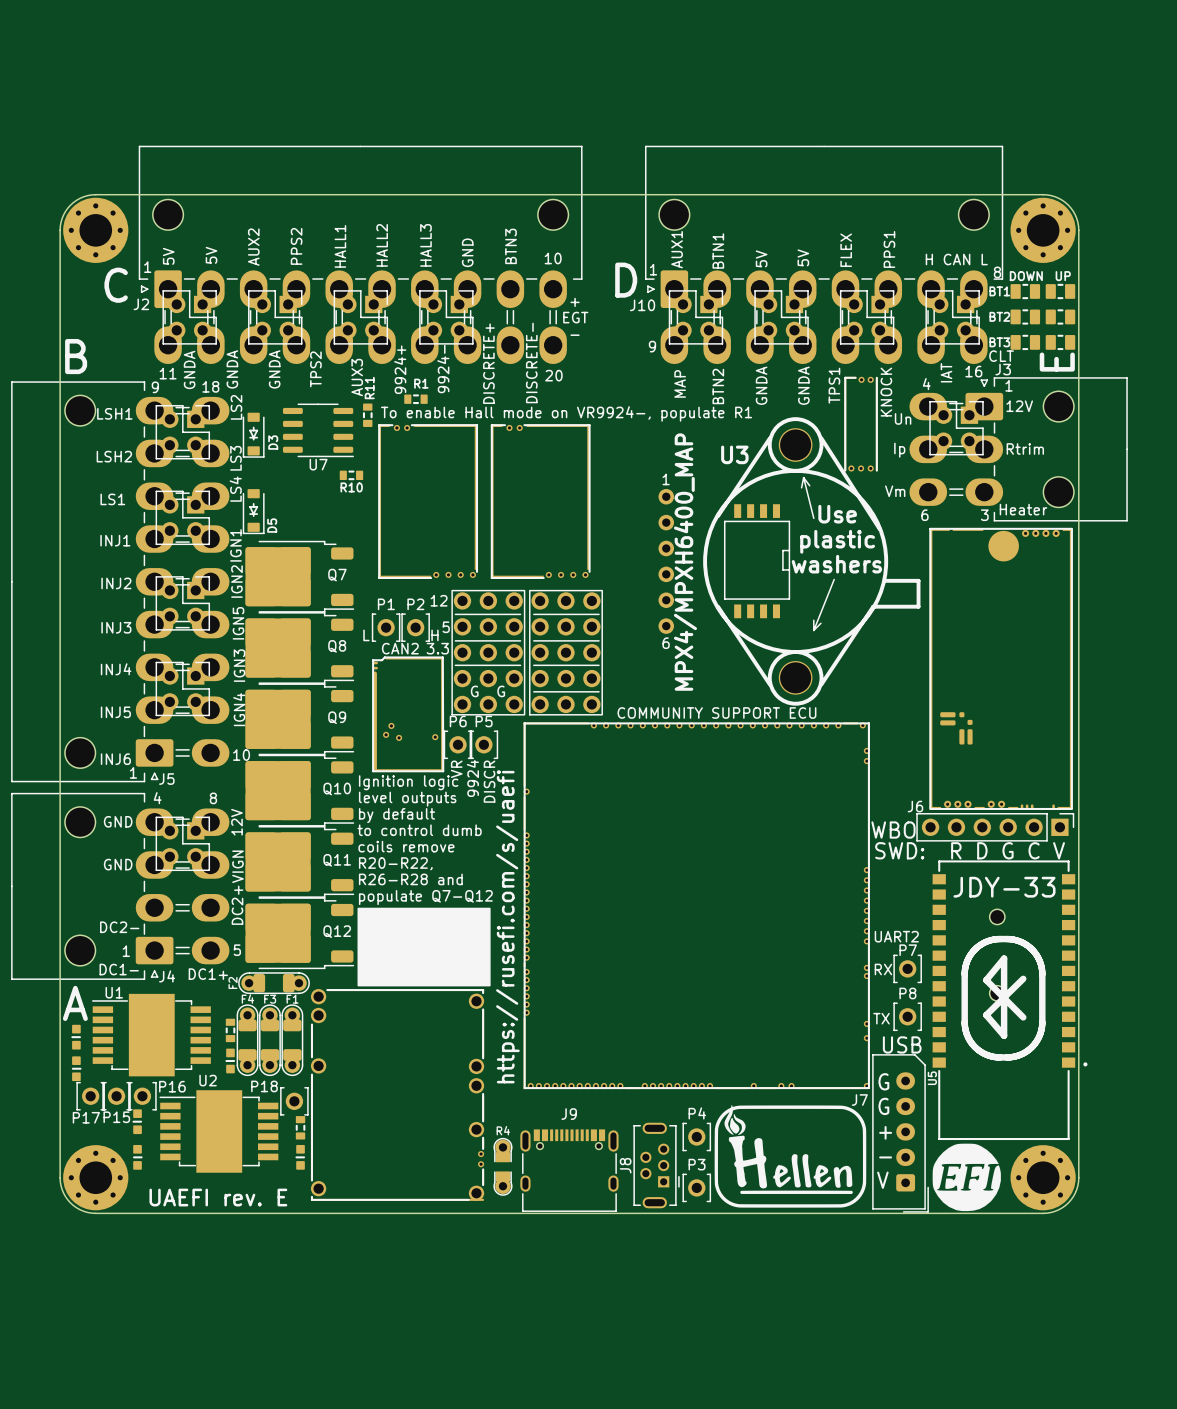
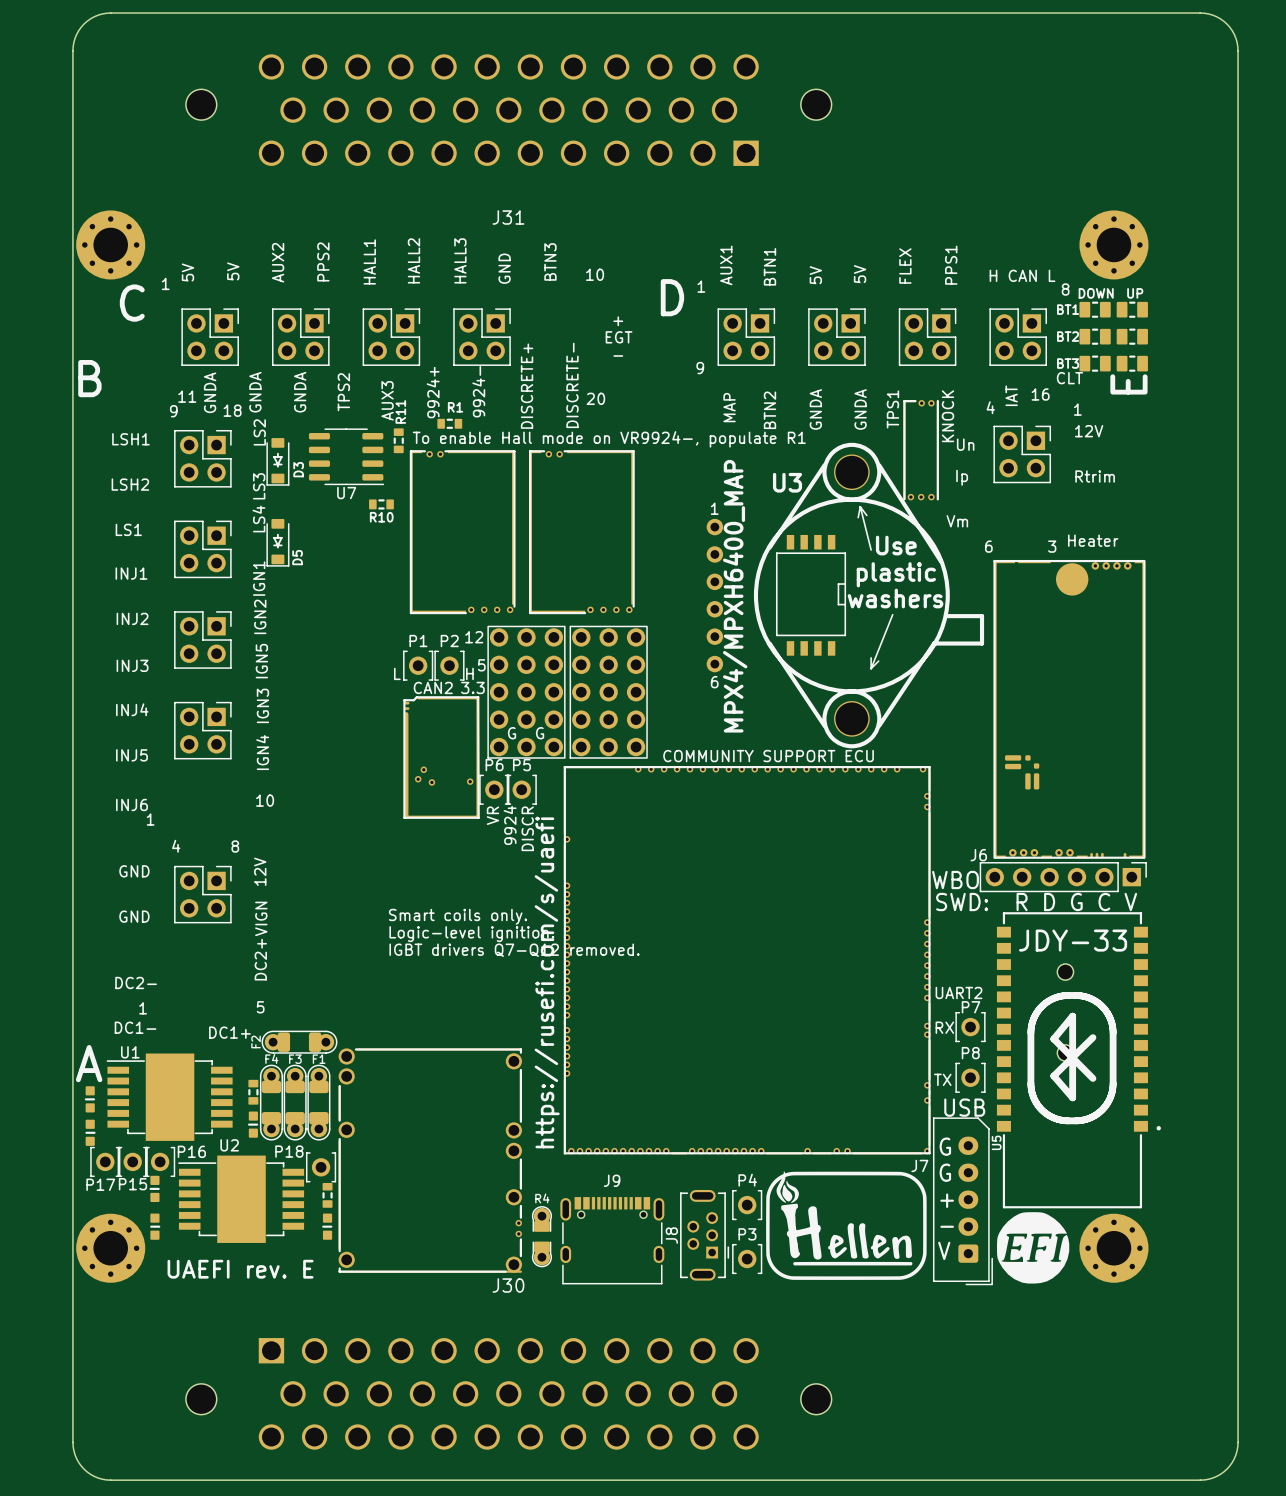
J31: none -> (508, 110)
board edge: (60, 230) (62, 218) (70, 205) (83, 196) (95, 194) (1043, 194) (1054, 196) (1068, 205) (1076, 218) (1078, 230) (1078, 1177) (1075, 1193) (1068, 1202) (1054, 1211) (1043, 1213) (95, 1213) (83, 1211) (70, 1202) (62, 1189) (60, 1177) -> (72, 244) (73, 46) (76, 34) (84, 24) (102, 13) (1200, 13) (1212, 15) (1223, 21) (1232, 30) (1237, 42) (1238, 1442) (1235, 1454) (1226, 1469) (1216, 1476) (1200, 1480) (102, 1479) (90, 1474) (81, 1465) (73, 1446) (72, 1248)
J2: (360, 254) -> none
J10: (824, 254) -> none
J3: (1018, 449) -> none
Q7: (299, 576) -> none
J5: (120, 581) -> none
line: (455, 614) (520, 614) -> none
line: (533, 614) (598, 614) -> none
line: (455, 640) (520, 640) -> none
line: (533, 640) (598, 640) -> none
Q8: (299, 648) -> none
line: (455, 665) (520, 665) -> none
line: (533, 665) (598, 665) -> none
line: (533, 691) (598, 691) -> none
Q9: (299, 719) -> none
text: Ignition logic (408, 782) -> none
Q10: (299, 790) -> none
text: level outputs (407, 799) -> none
text: by default (397, 815) -> none
text: to control dumb (419, 830) -> none
text: coils remove (406, 846) -> none
Q11: (299, 861) -> none
text: R20-R22, (395, 863) -> Smart coils only. (457, 916)
text: R26-R28 and (410, 879) -> Logic-level ignition. (471, 934)
J4: (120, 886) -> none
text: populate Q7-Q12 (425, 897) -> IGBT drivers Q7-Q12 removed. (514, 950)
drawing: [357, 907, 491, 987] -> none
Q12: (299, 933) -> none
J30: none -> (508, 1393)

